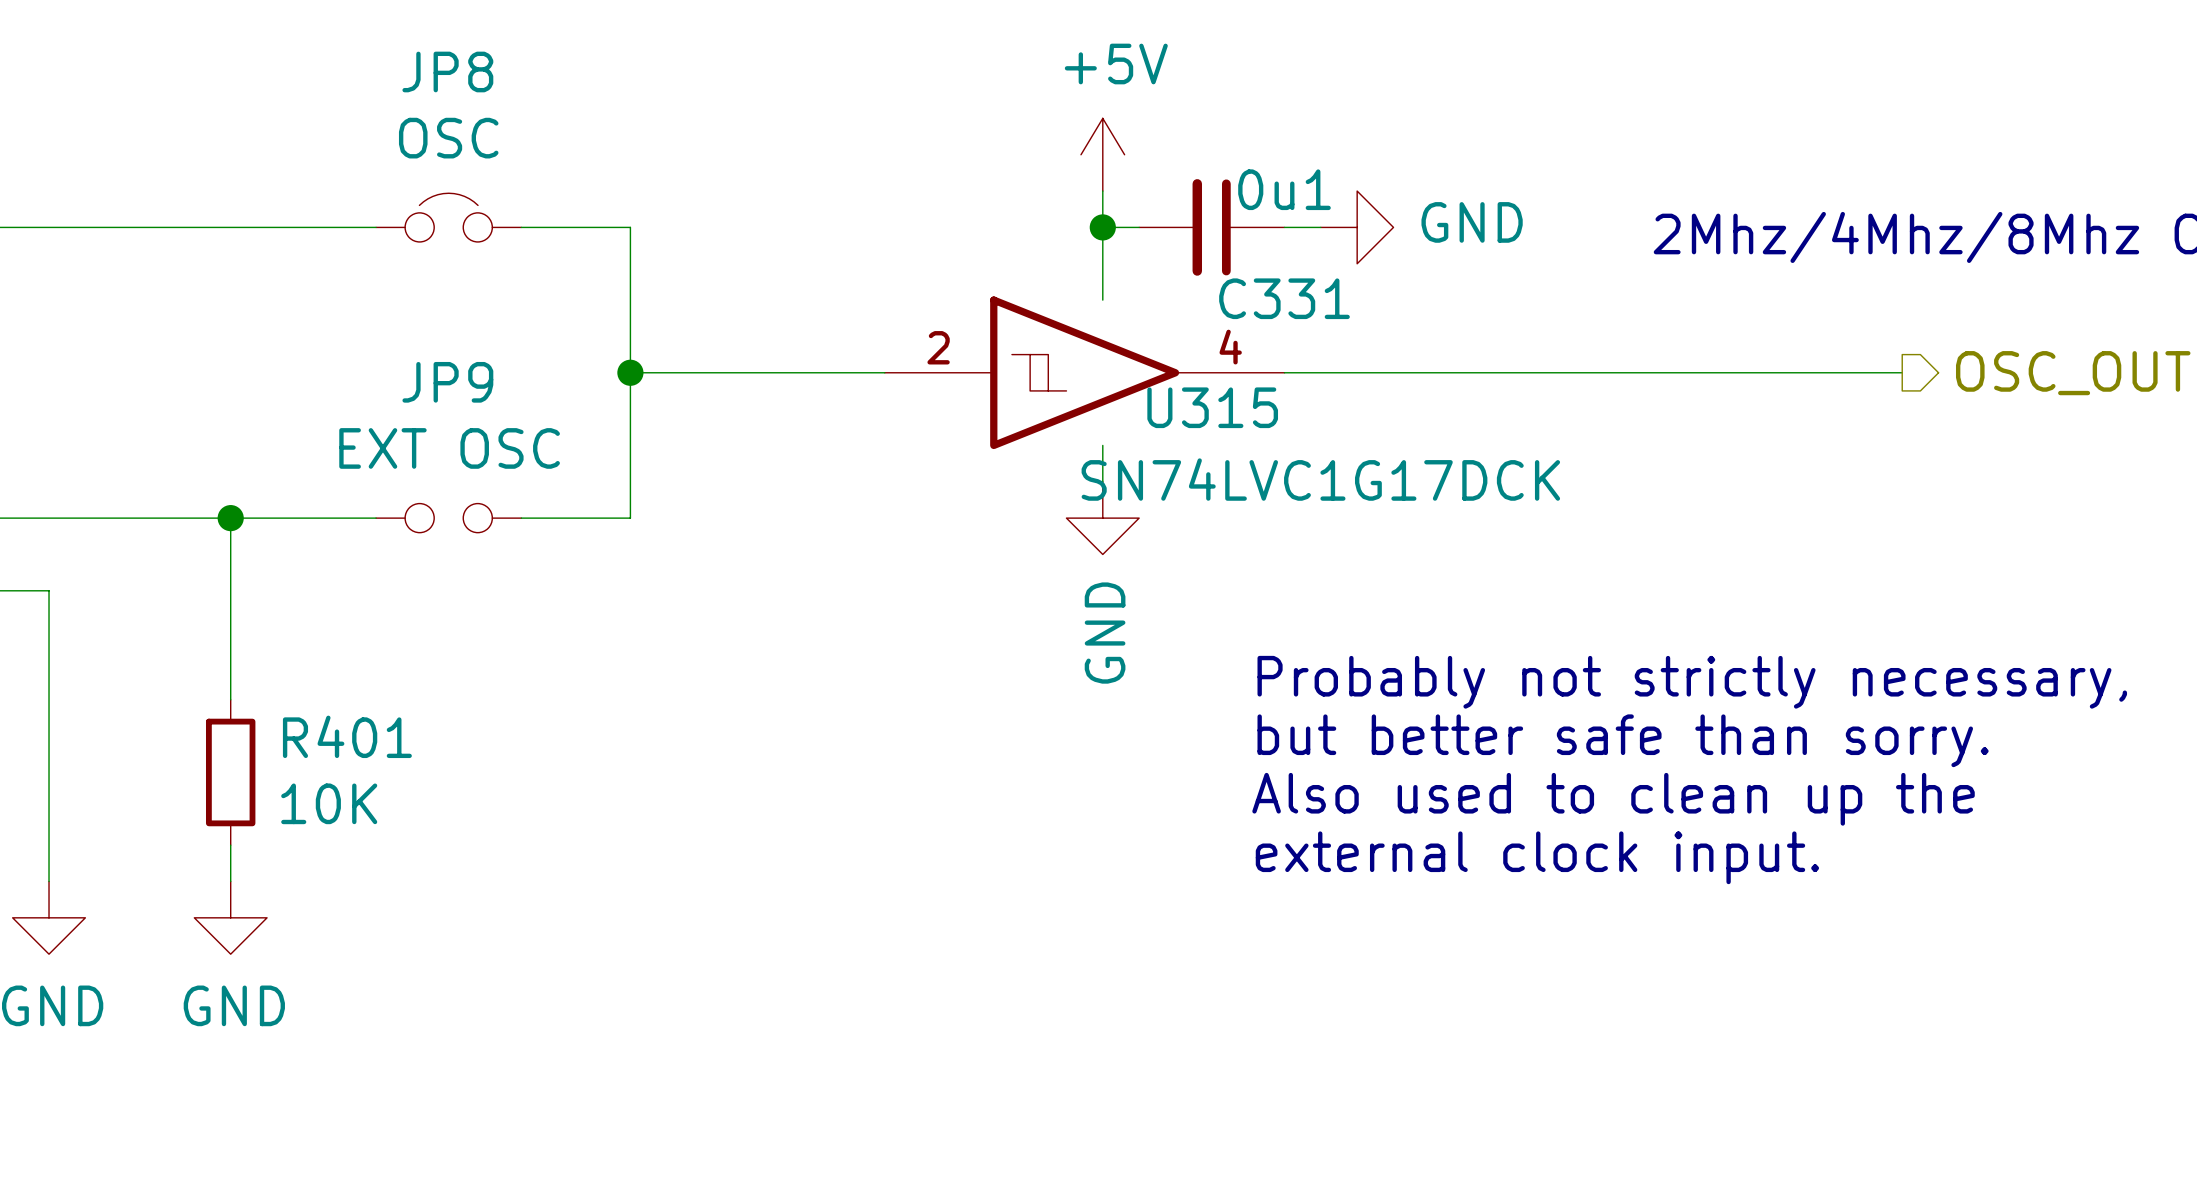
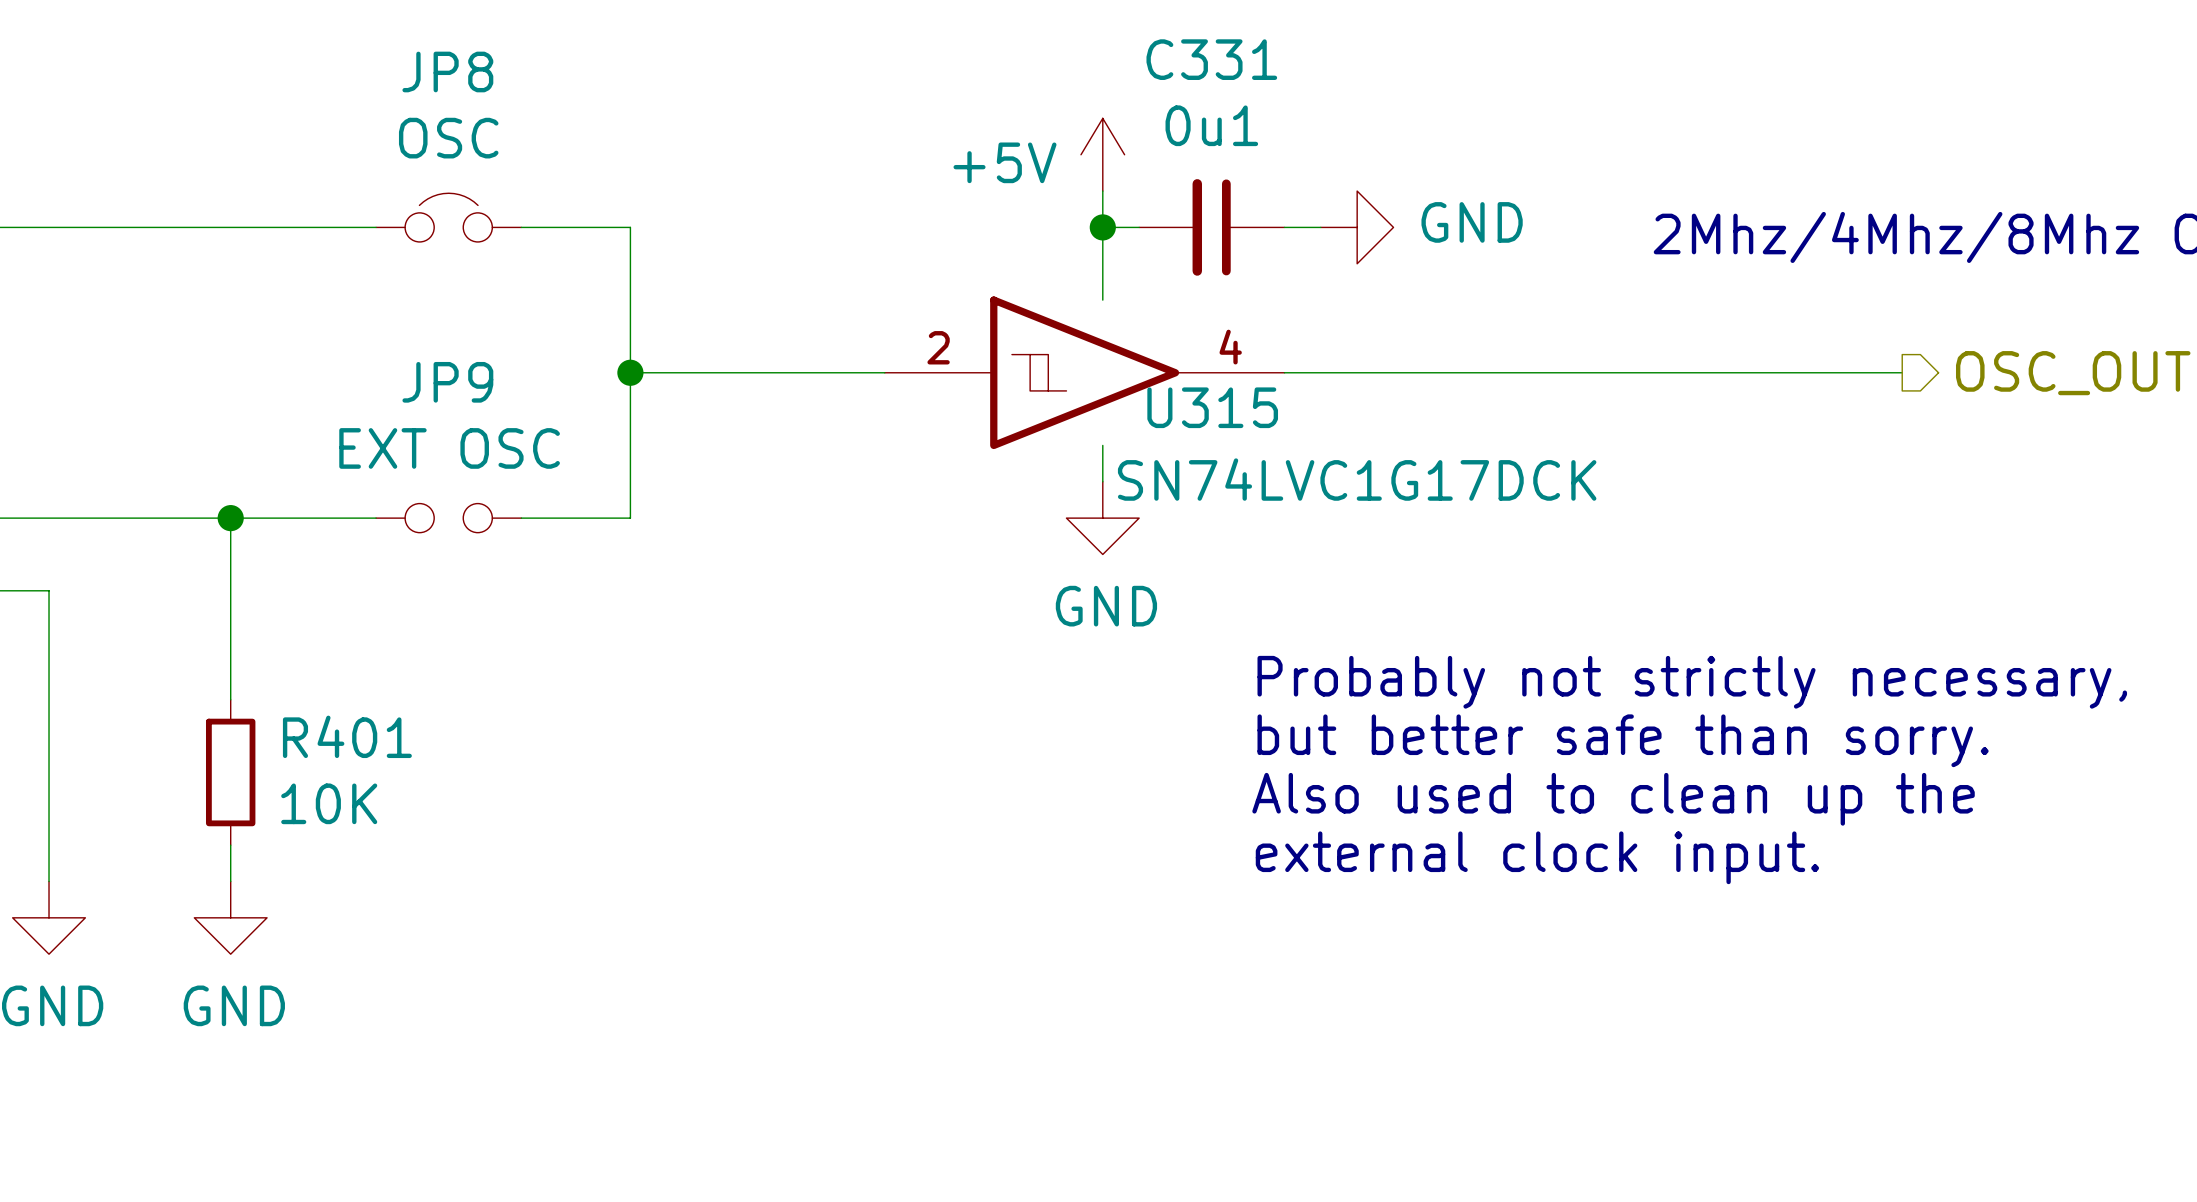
power symbol text position: +5V (1116, 63) -> +5V (1005, 162)
C331 value position: 0u1 (1284, 189) -> 0u1 (1211, 125)
C331 name position: C331 (1284, 298) -> C331 (1211, 59)
U315 value position: SN74LVC1G17DCK (1320, 479) -> SN74LVC1G17DCK (1357, 479)
power symbol text rotation: 0° (1105, 633) -> 90° clockwise (1106, 606)

